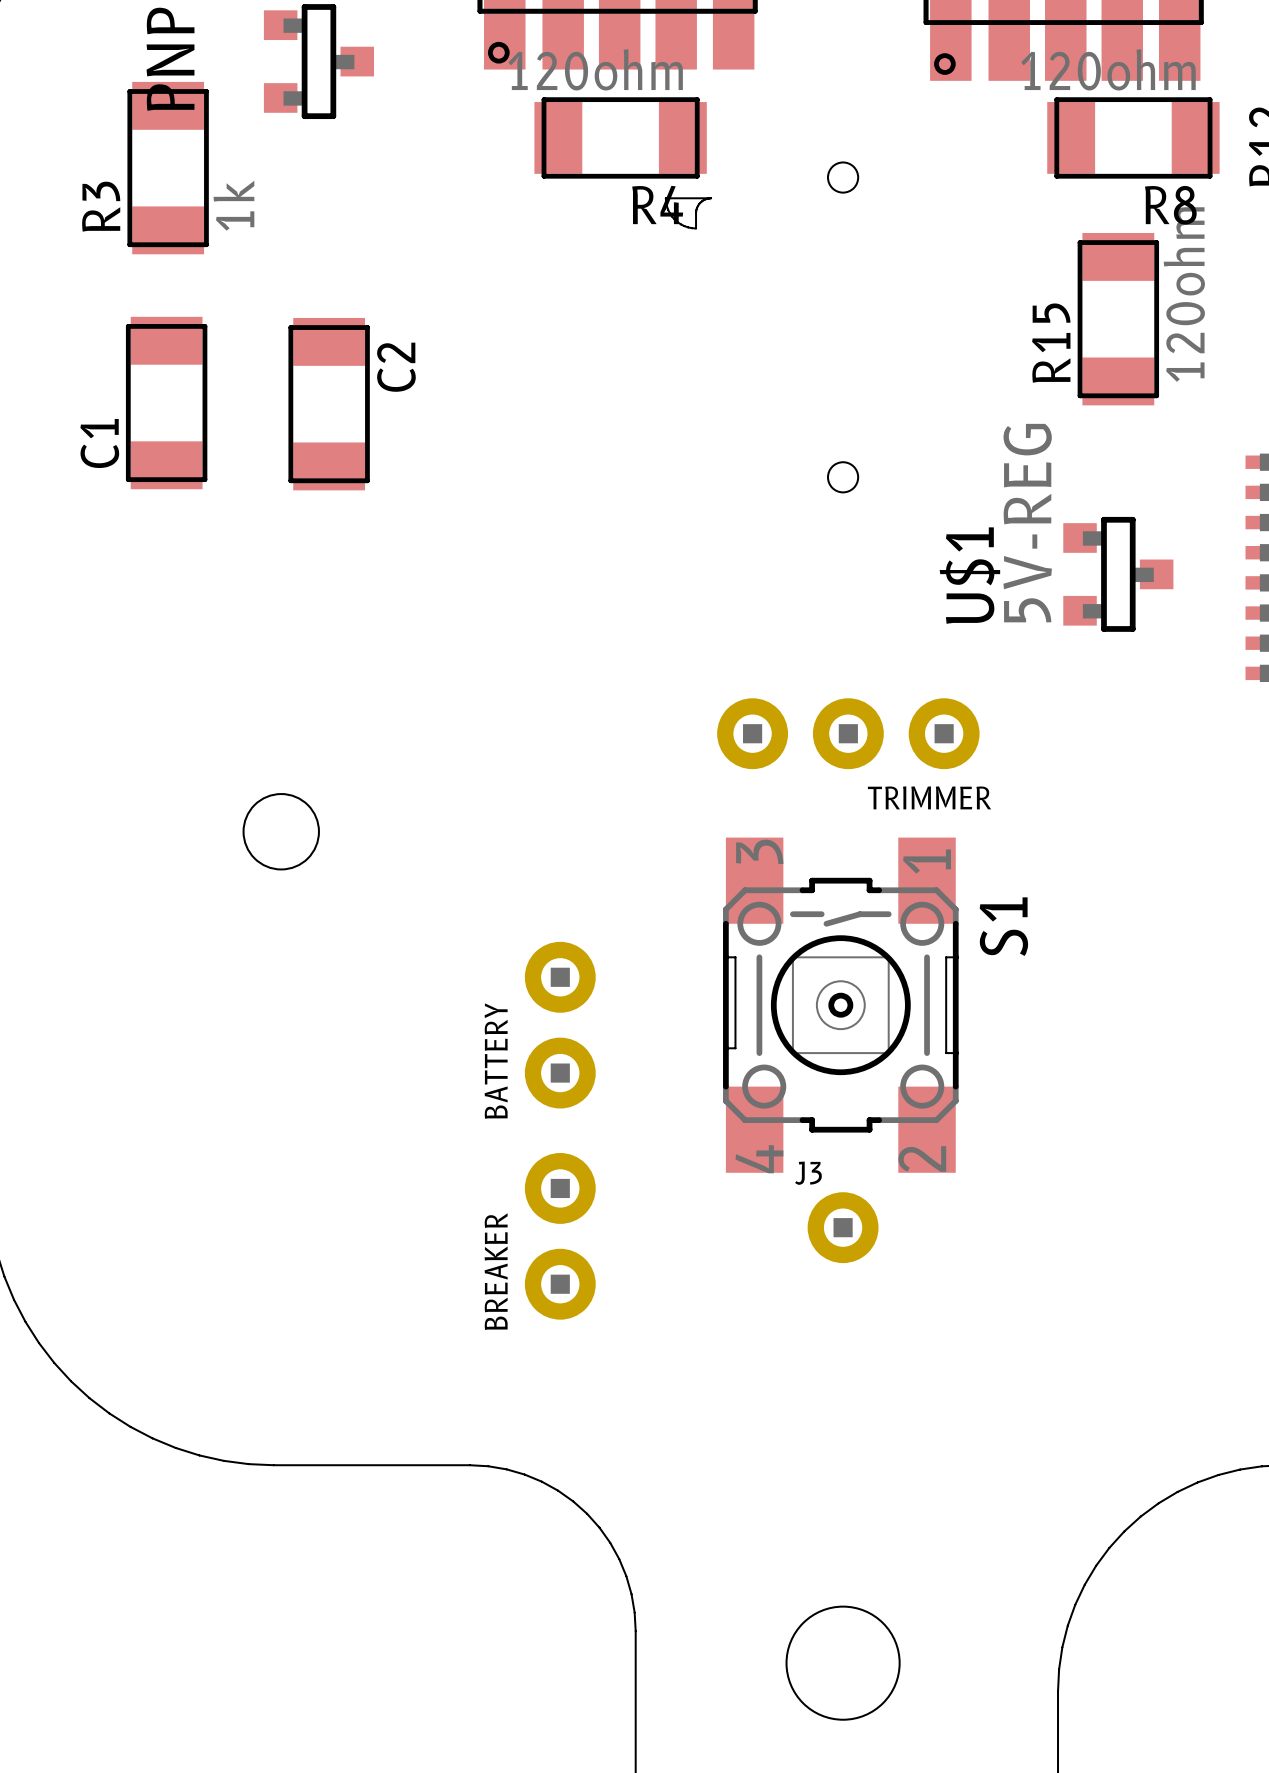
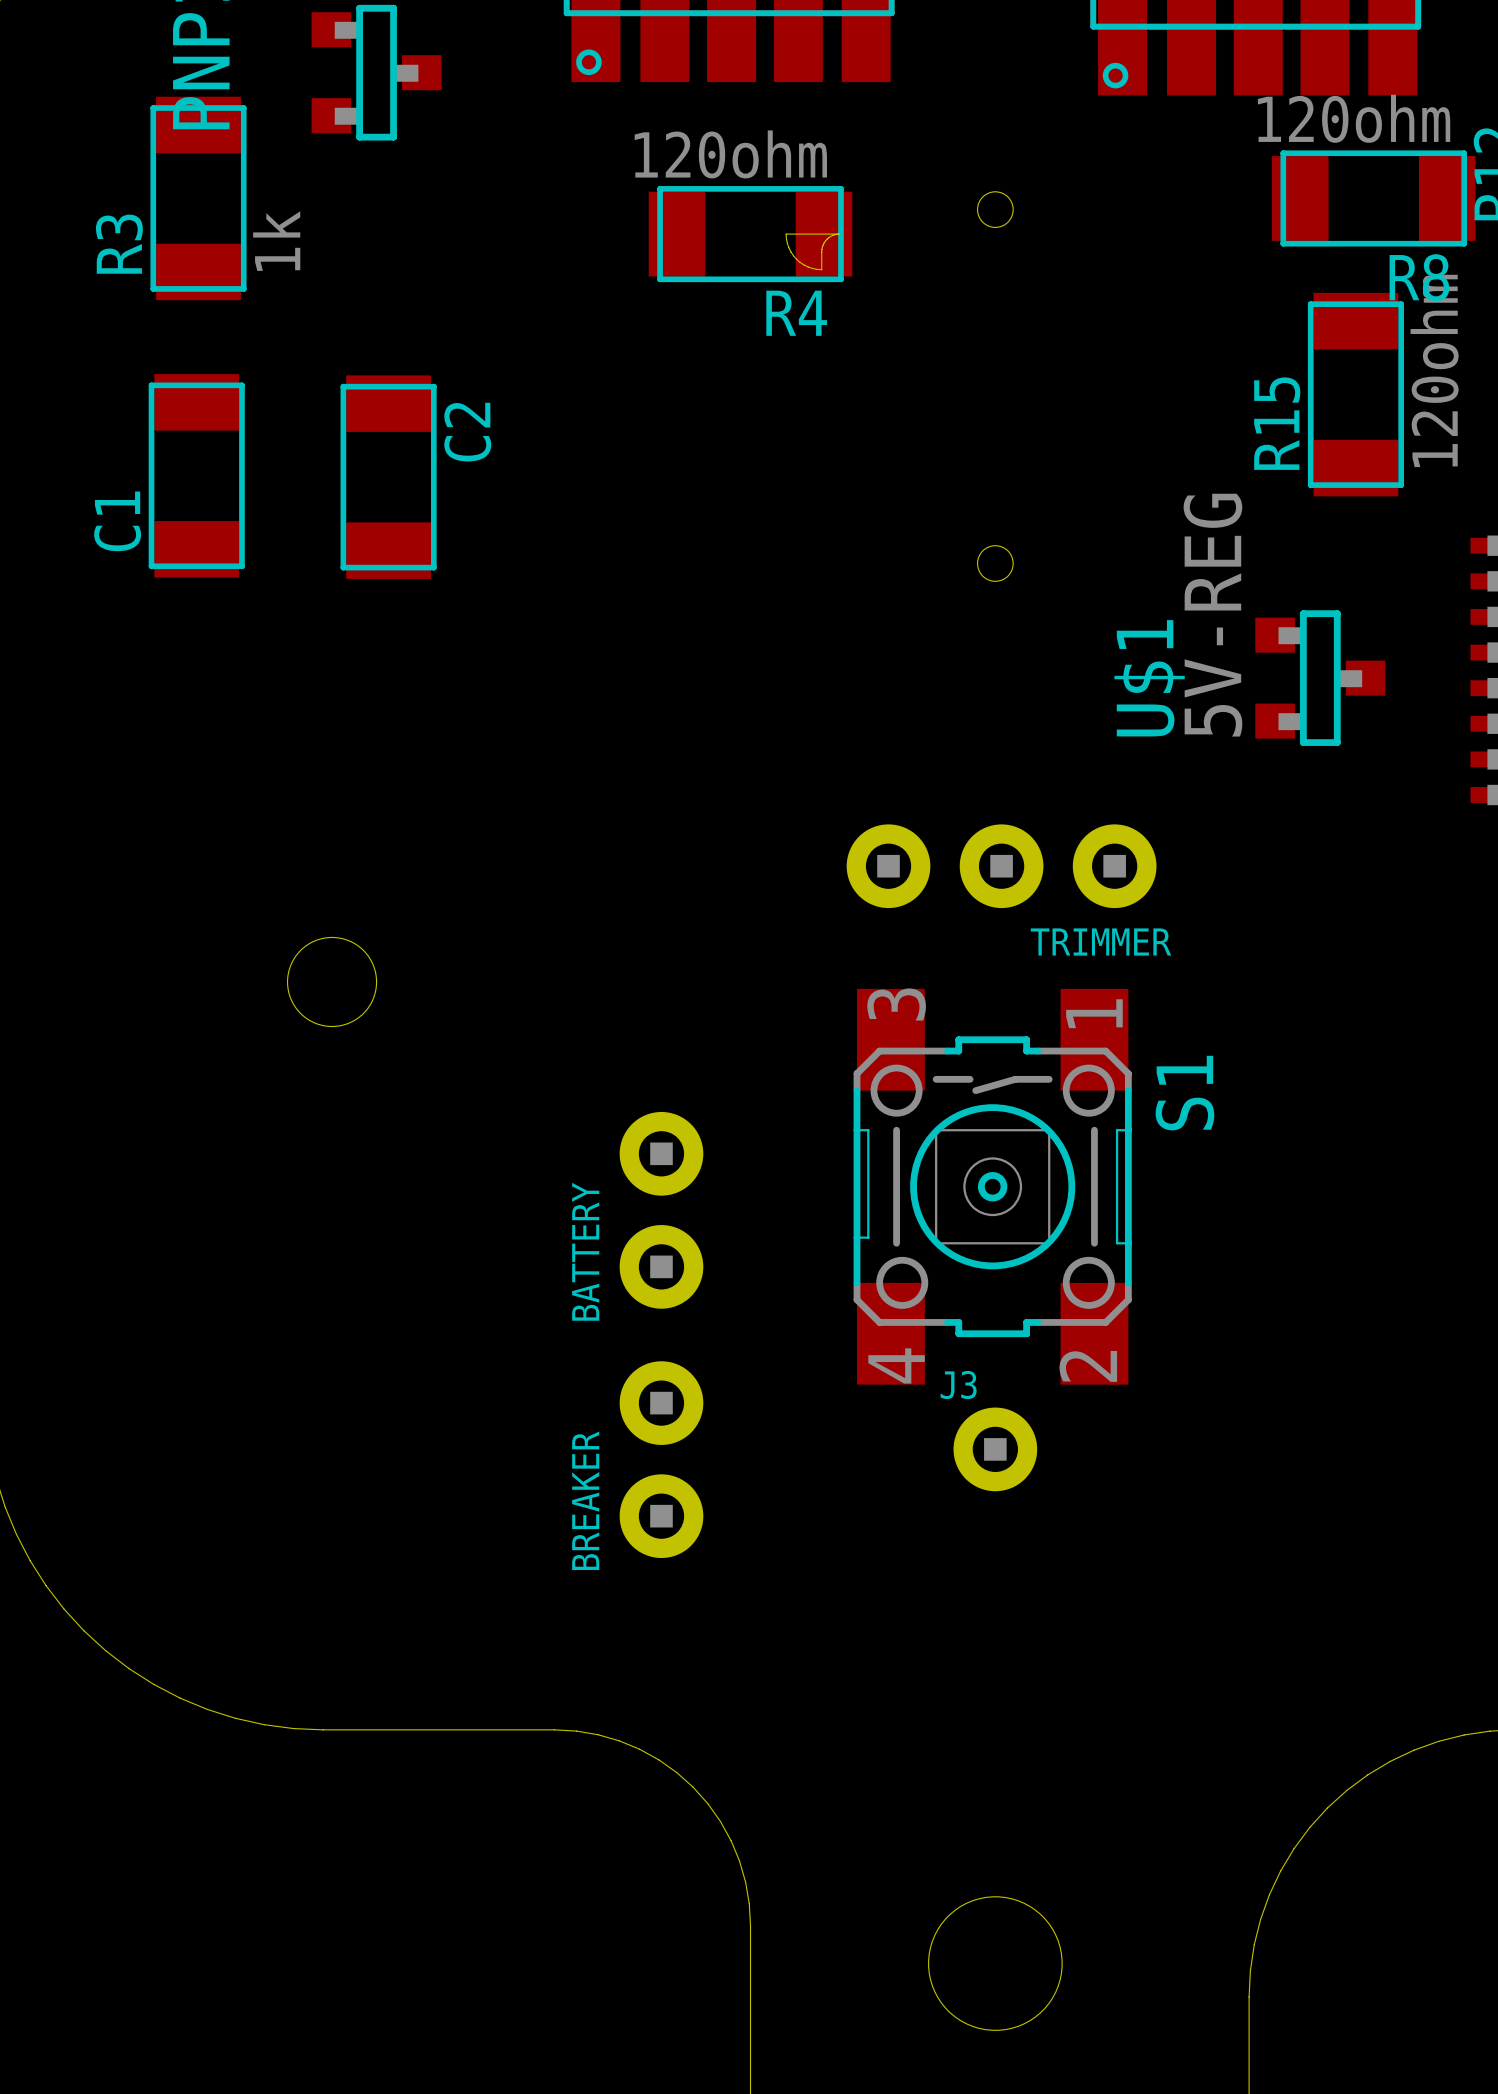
R4 position: (620, 137) -> (750, 234)
R8 position: (1133, 137) -> (1373, 198)
R15 position: (1118, 319) -> (1355, 394)

